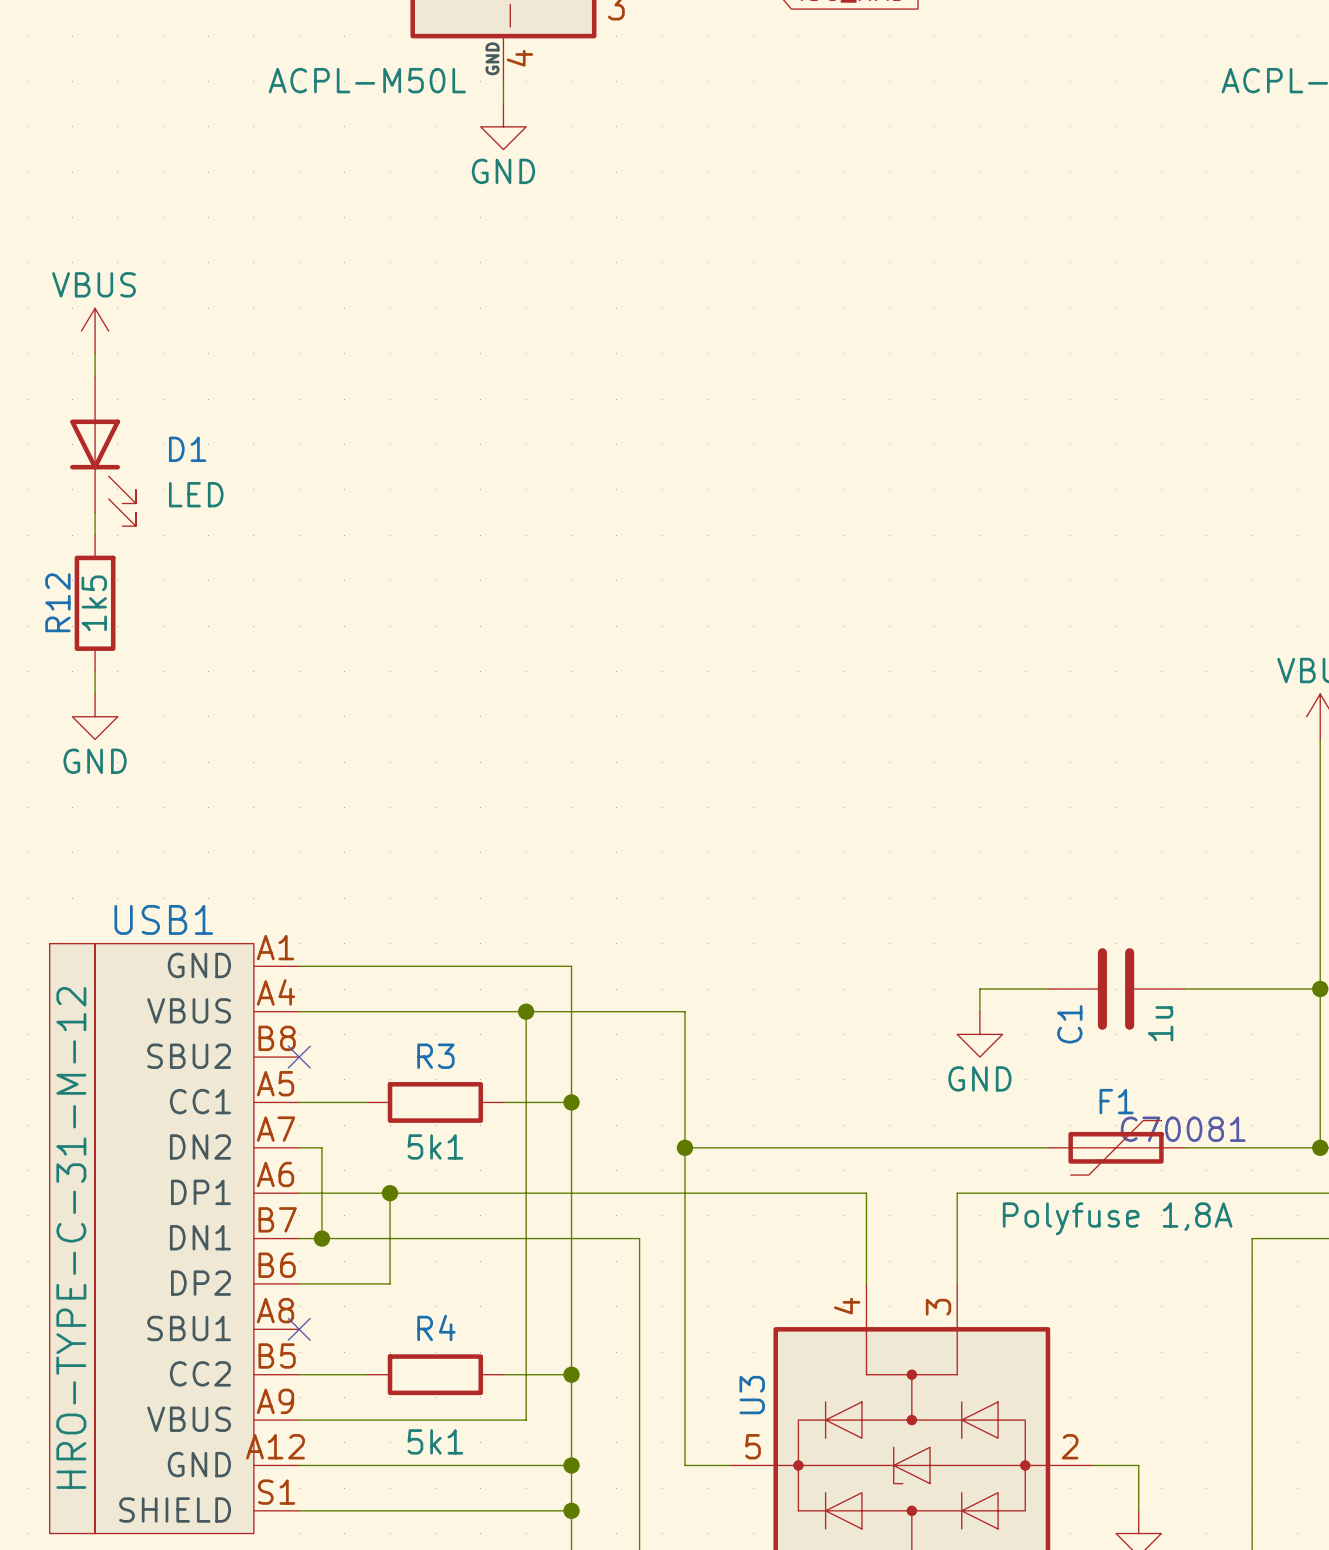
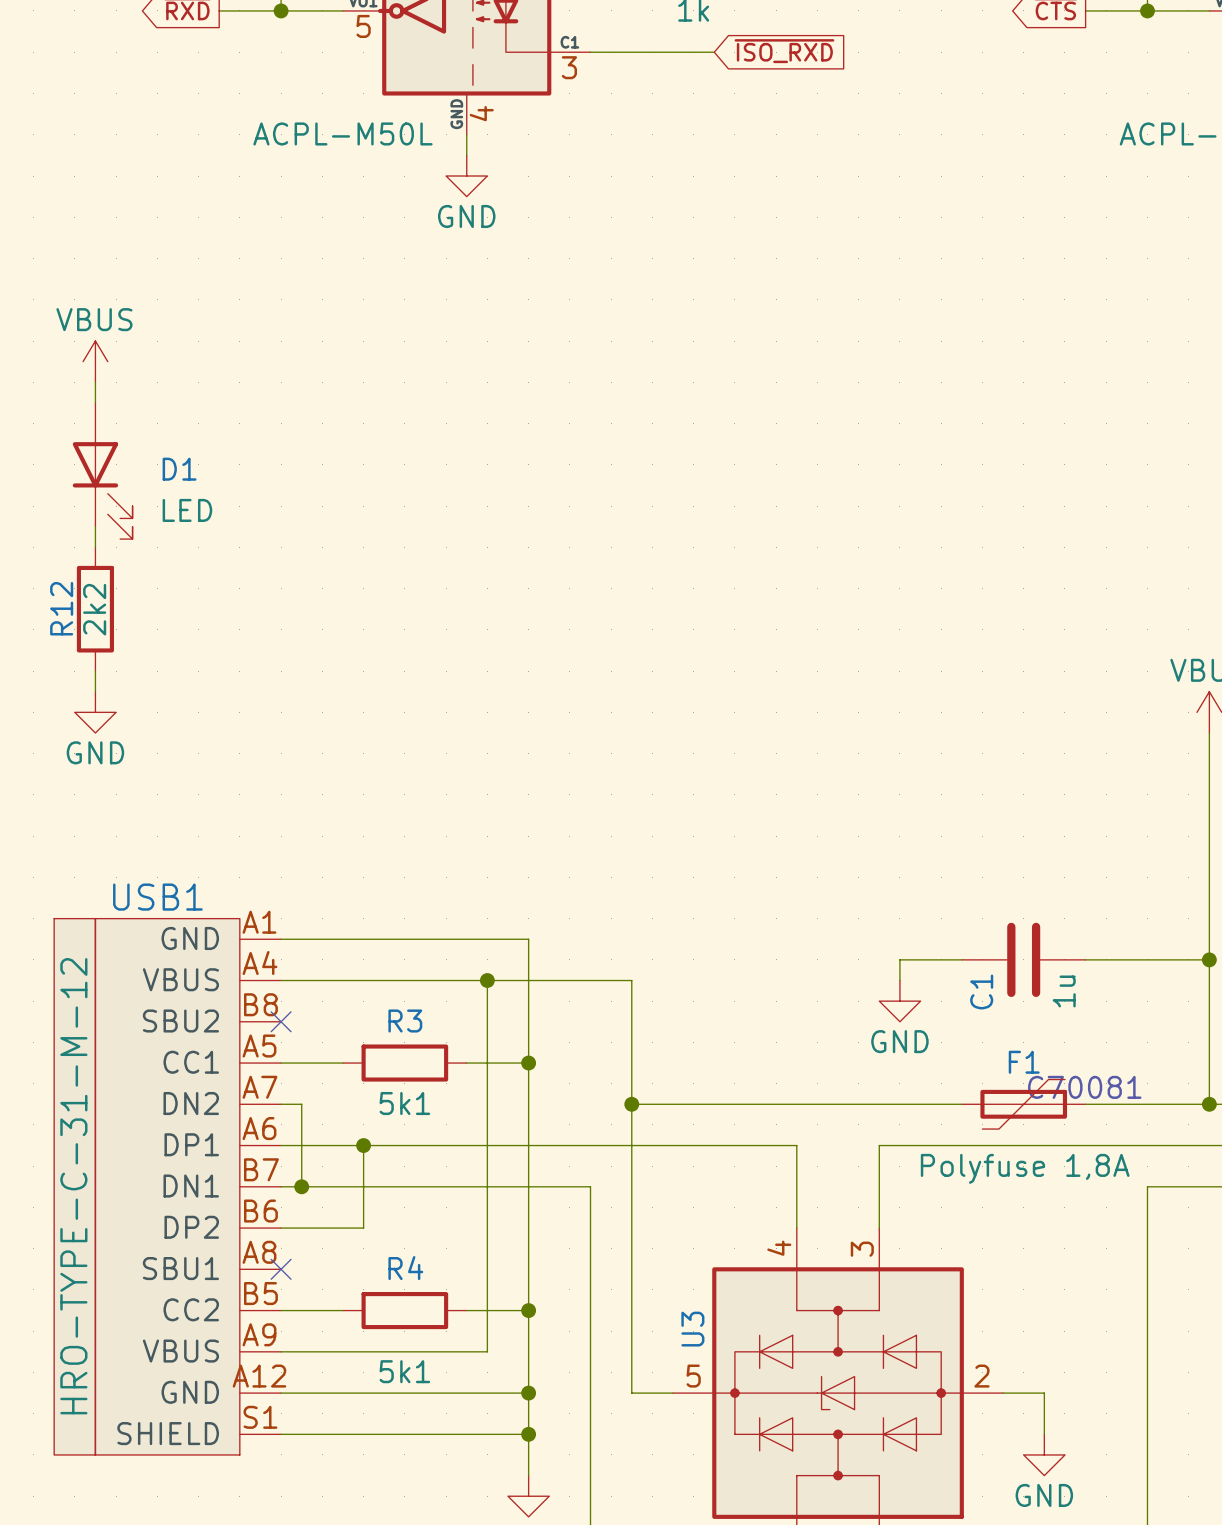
R12 value: 1k5 (94, 603) -> 2k2 (94, 609)

